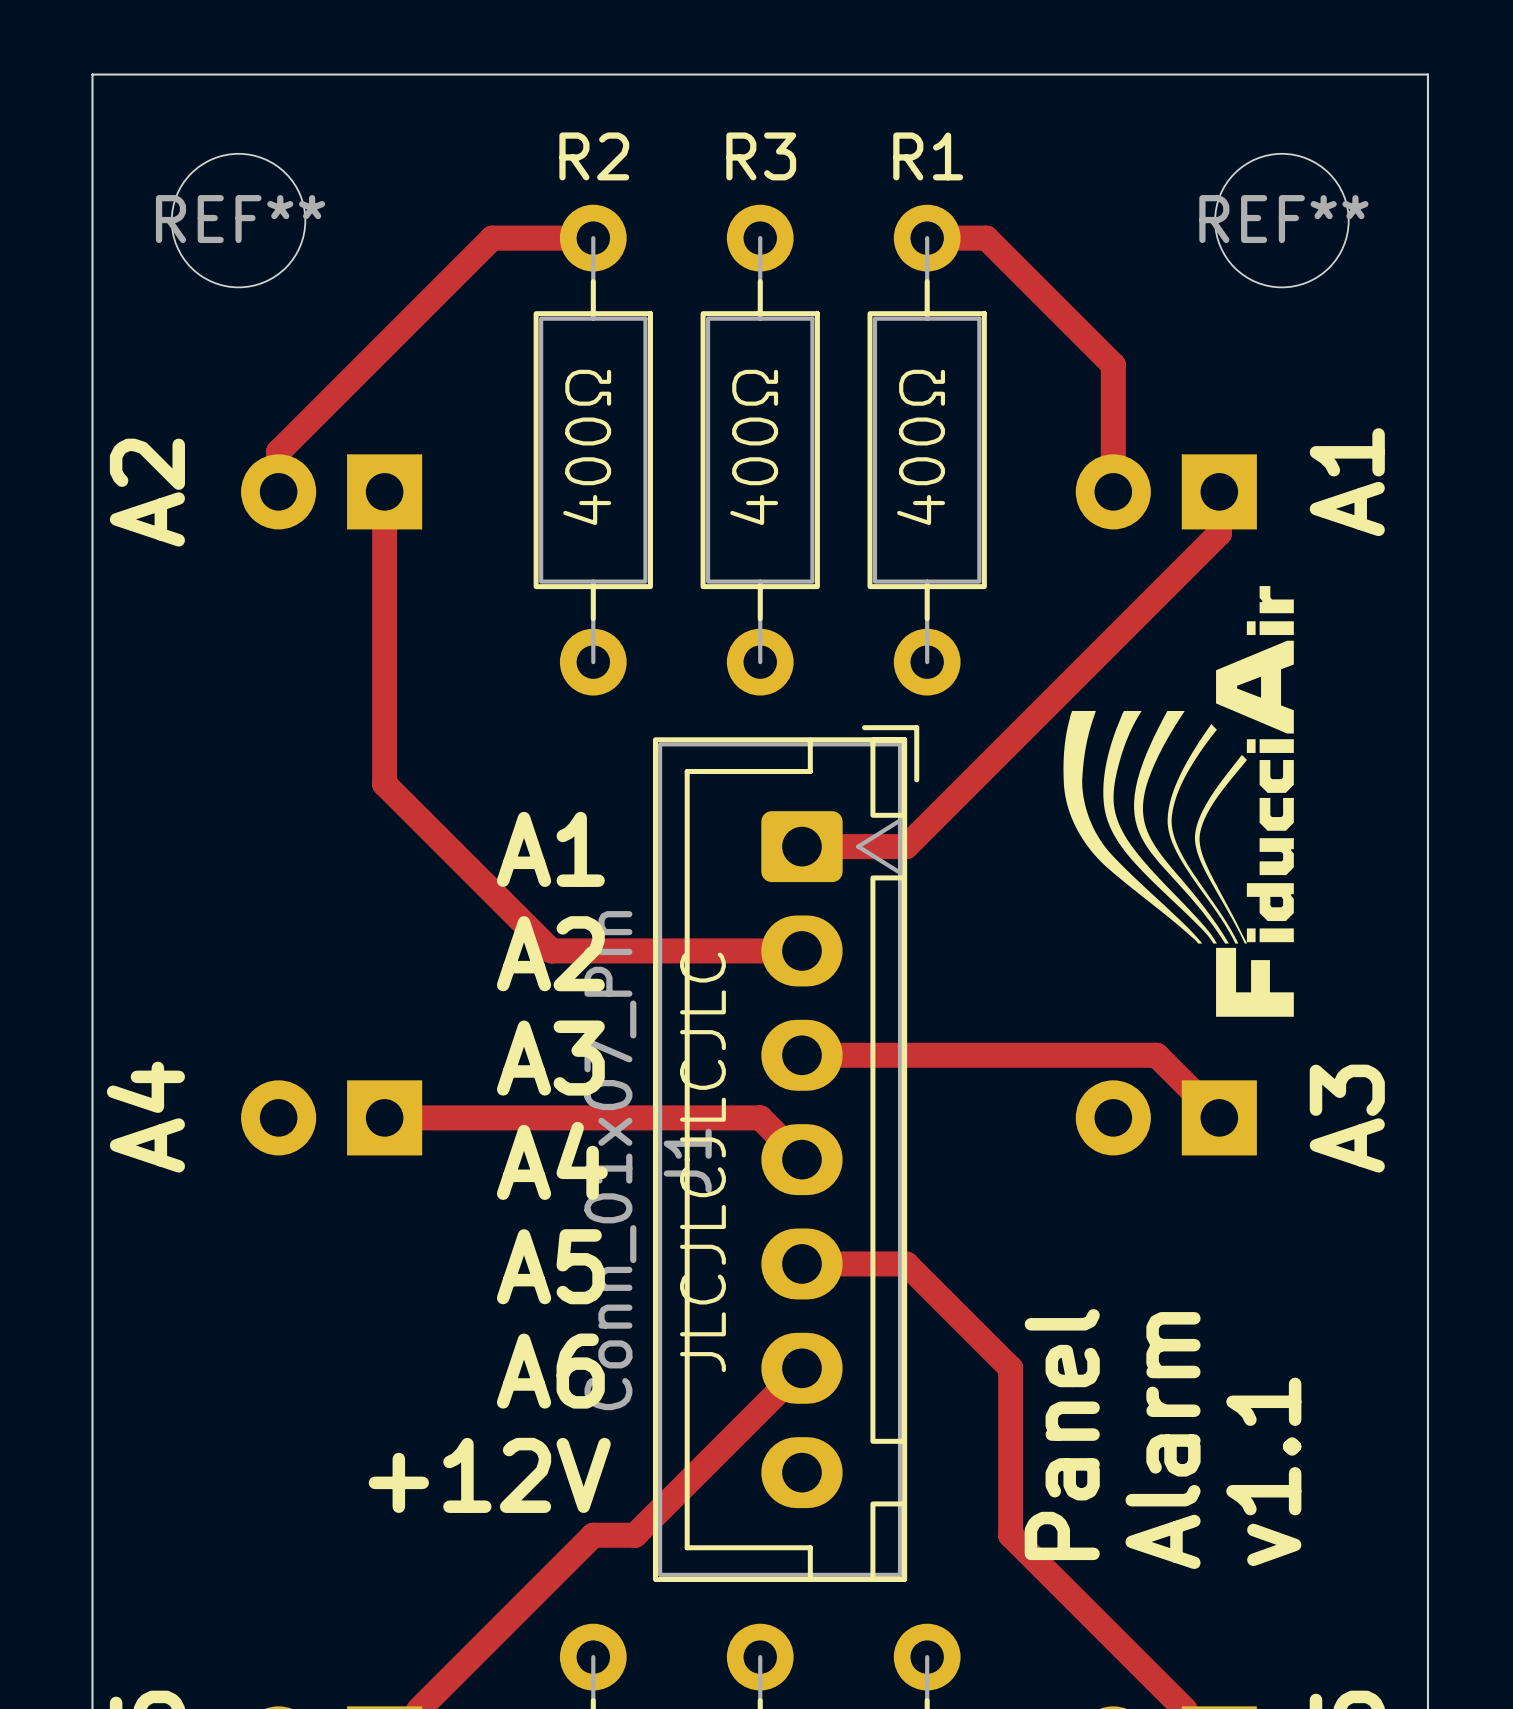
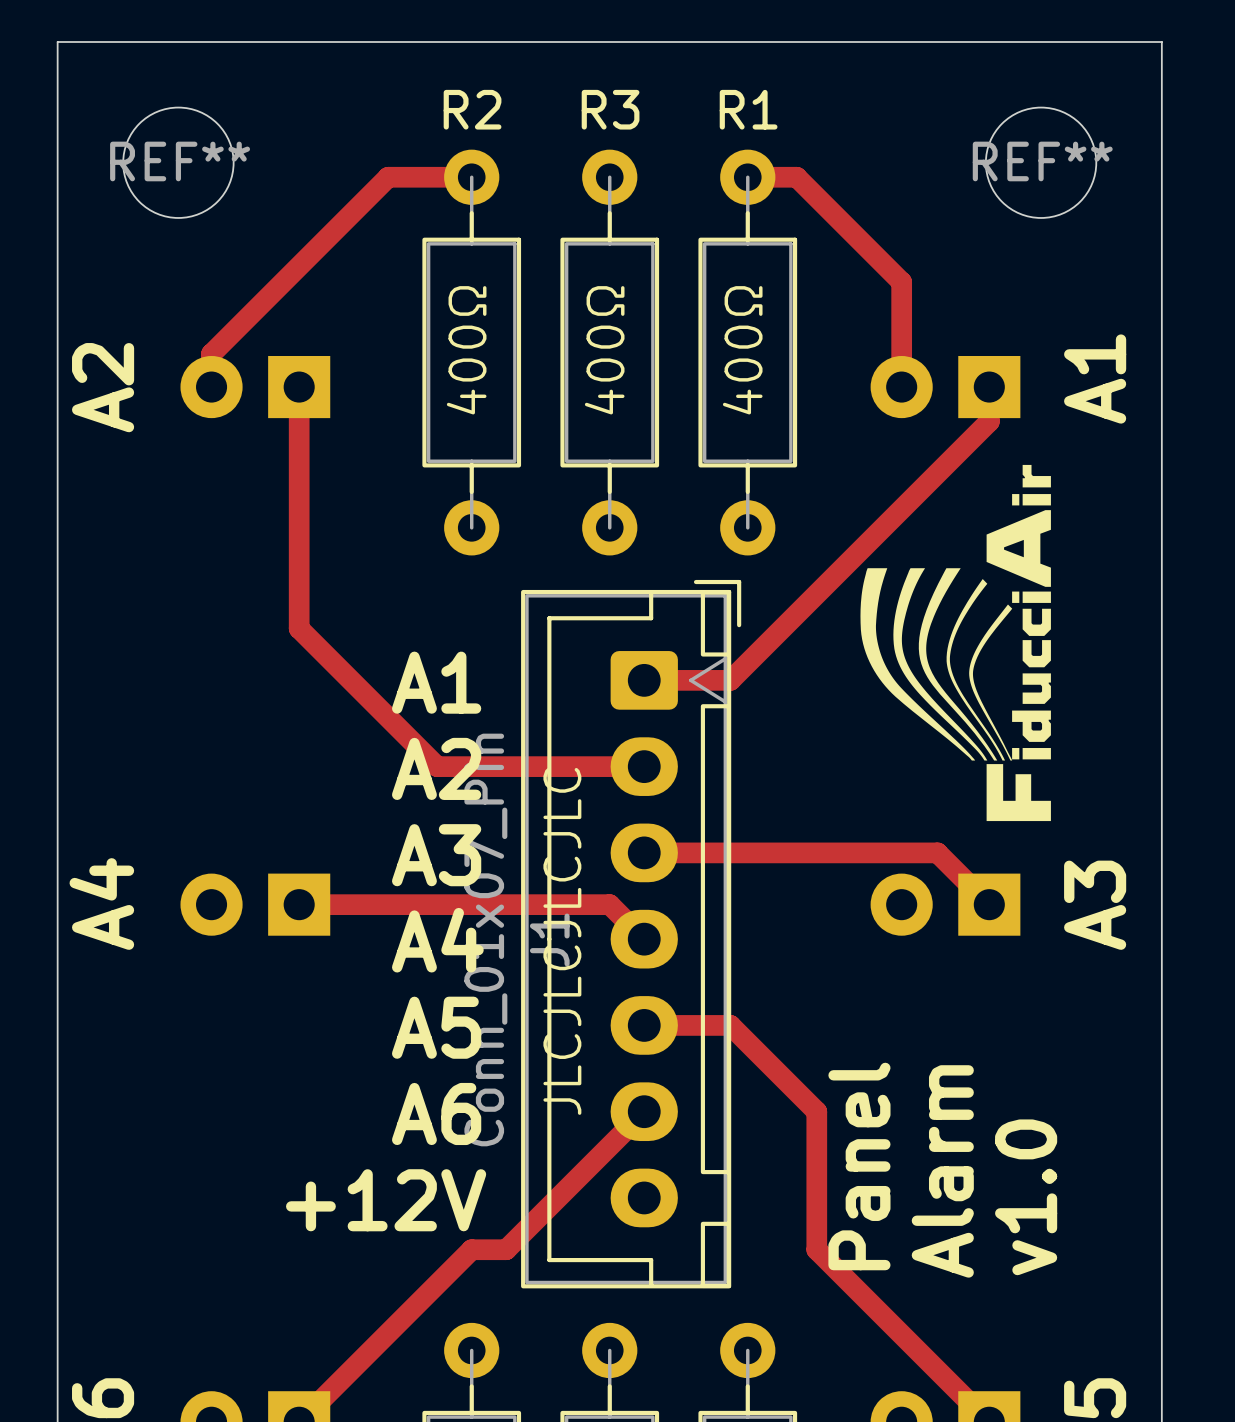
text: v1.1 (1263, 1471) -> v1.0 (1026, 1197)

